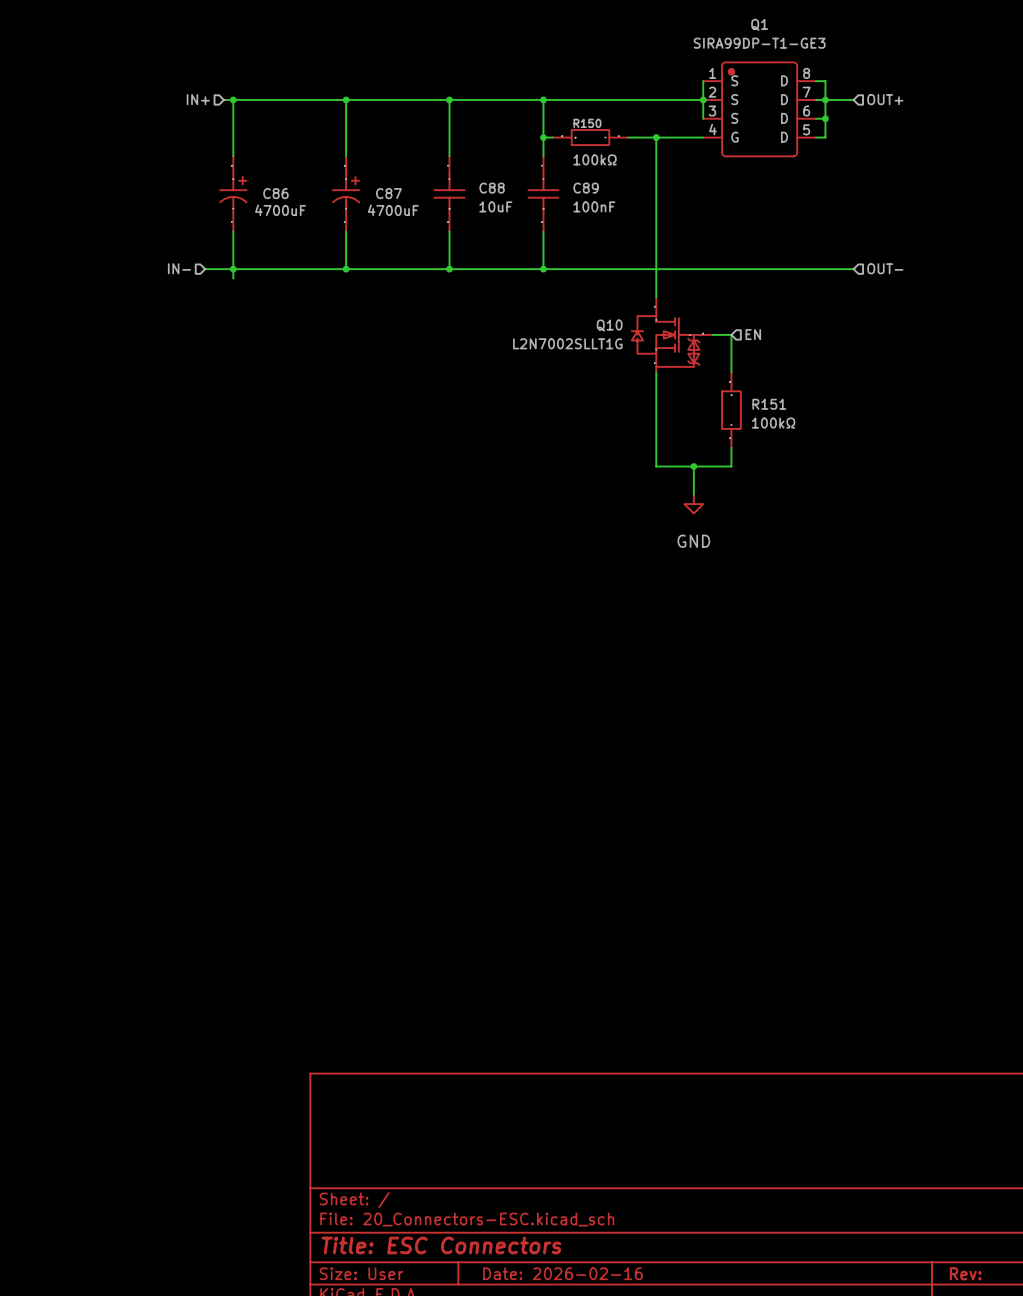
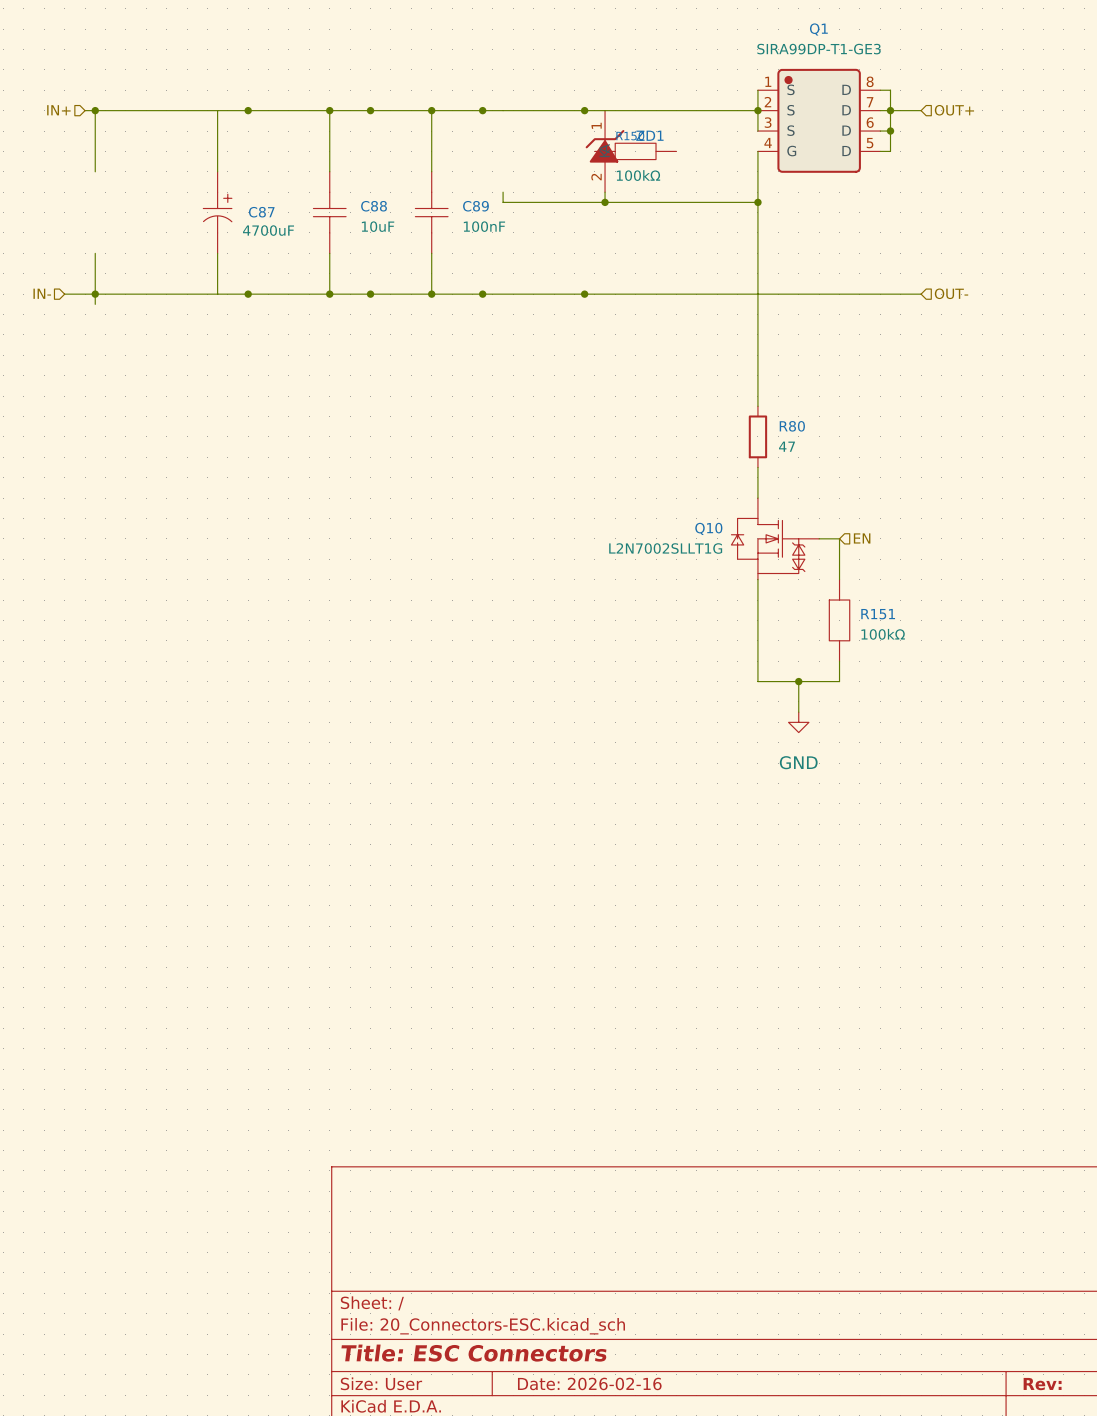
wire: none -> (85, 110) (237, 110)
junction: none -> (95, 110)
hierarchical label position: IN+ (198, 99) -> IN+ (58, 110)
wire: (233, 99) (233, 156) -> (95, 110) (95, 171)
junction: none -> (329, 110)
wire: (346, 99) (346, 156) -> (217, 110) (217, 171)
junction: none -> (431, 110)
wire: (449, 99) (449, 156) -> (329, 110) (329, 171)
wire: (543, 99) (543, 156) -> (431, 110) (431, 171)
wire: (543, 137) (552, 137) -> none
junction: (543, 137) -> none
ZD1: none -> (605, 151)
wire: (628, 137) (703, 137) -> (757, 406) (757, 151)
wire: (656, 137) (656, 297) -> none
junction: (656, 137) -> none
wire: none -> (503, 192) (503, 202) (757, 202)
wire: none -> (605, 192) (605, 202)
junction: none -> (605, 202)
junction: none -> (757, 202)
C86: 4700uF (233, 193) -> none
C87 position: (346, 193) -> (217, 212)
C88 position: (449, 193) -> (329, 212)
C89 position: (543, 193) -> (431, 212)
wire: none -> (217, 253) (217, 294) (64, 294)
wire: (233, 231) (233, 278) -> (95, 253) (95, 304)
wire: (346, 231) (346, 269) -> none
wire: (449, 231) (449, 269) -> (329, 253) (329, 294)
wire: (543, 231) (543, 269) -> (431, 253) (431, 294)
hierarchical label position: IN- (179, 268) -> IN- (42, 293)
junction: none -> (95, 294)
junction: none -> (329, 294)
junction: none -> (431, 294)
Q10 position: (672, 334) -> (775, 538)
wire: (712, 334) (731, 334) (731, 372) -> (819, 538) (839, 538) (839, 579)
hierarchical label position: EN (753, 334) -> EN (862, 538)
wire: (656, 372) (656, 466) (731, 466) (731, 447) -> (757, 579) (757, 681) (839, 681) (839, 661)
R80: none -> 47 (757, 436)
R151 position: (731, 410) -> (839, 620)
wire: none -> (757, 467) (757, 498)
wire: (693, 466) (693, 494) -> (798, 681) (798, 712)
junction: (693, 466) -> none
power symbol position: GND (693, 504) -> GND (798, 722)
junction: none -> (798, 681)

